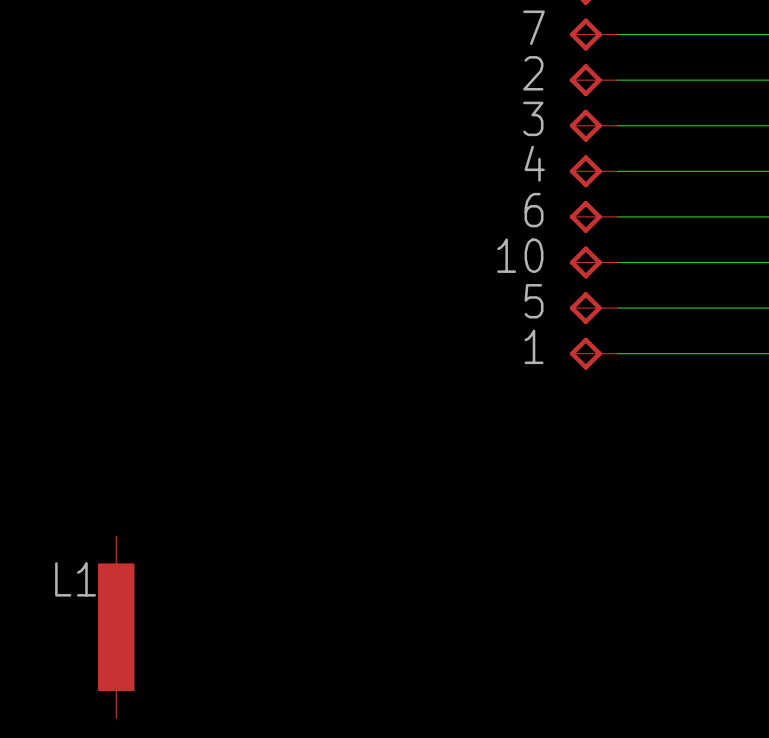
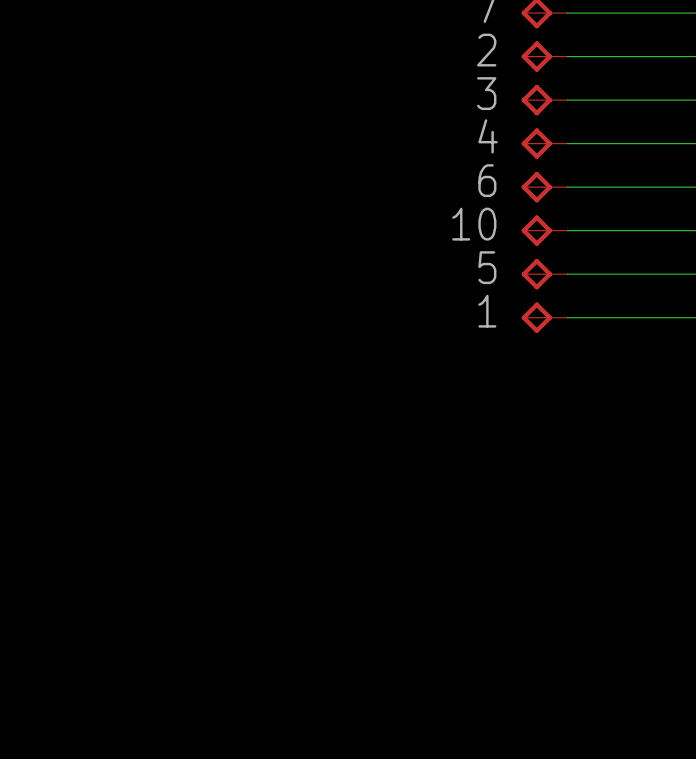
L1: (116, 627) -> none

